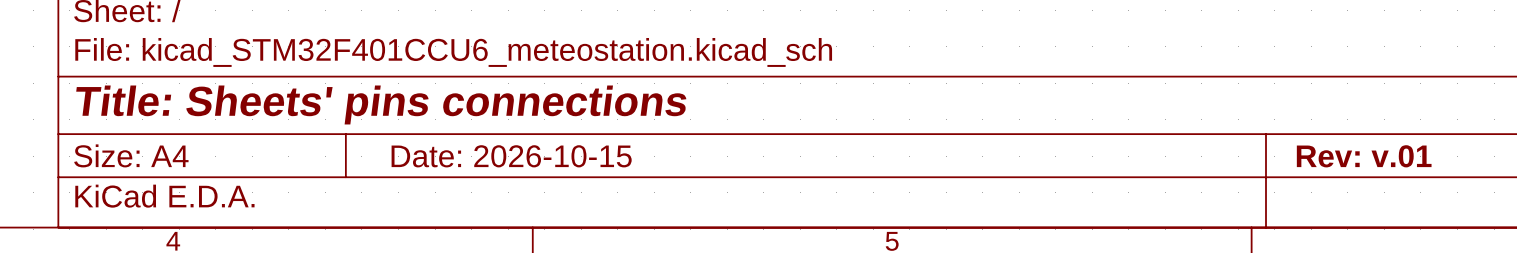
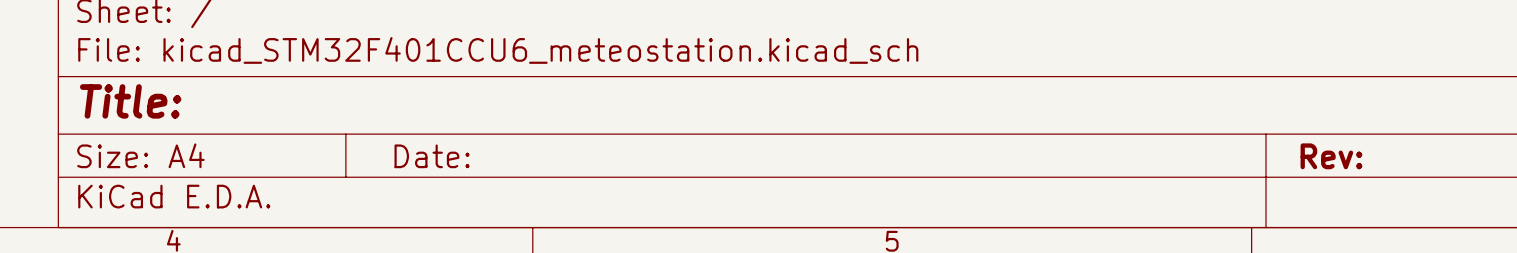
title block: Title: Sheets' pins connections (381, 104) -> Title: (130, 101)
title block: Date: 2026-10-15 (511, 156) -> Date: (432, 156)
title block: Rev: v.01 (1364, 156) -> Rev: (1331, 156)

